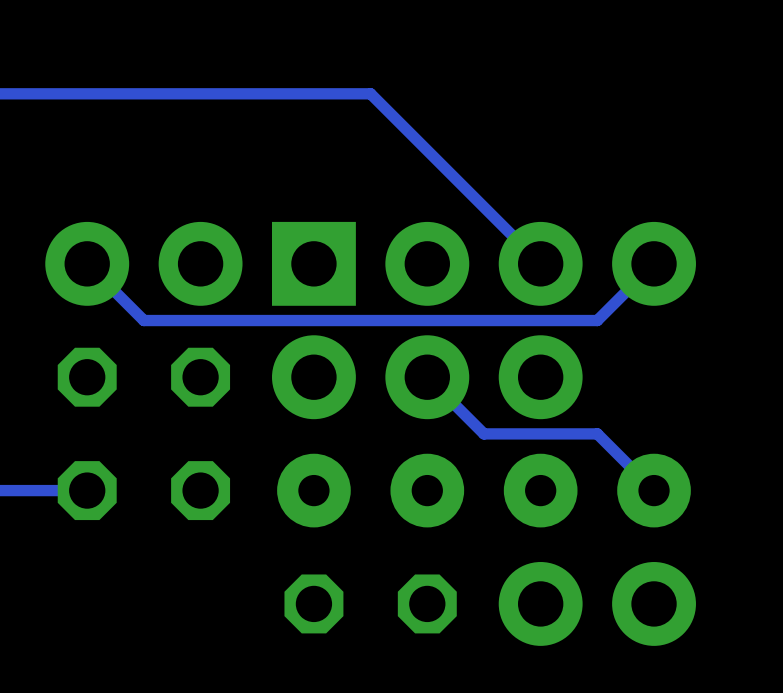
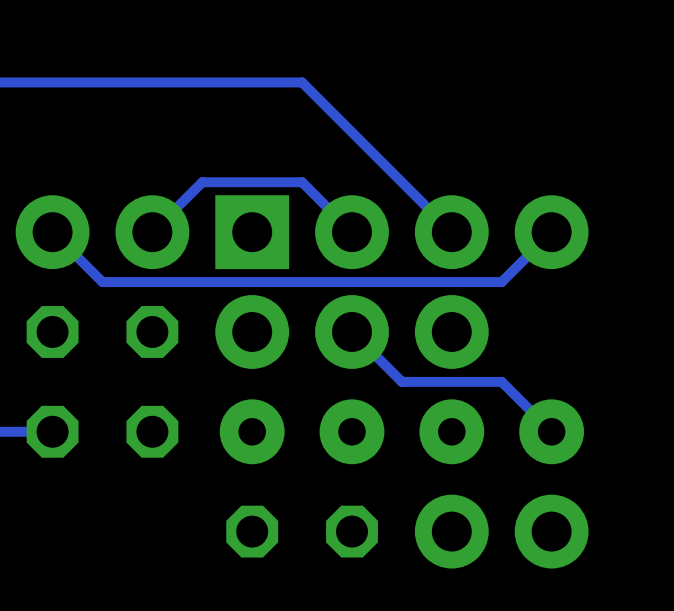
track: none -> (352, 232) (302, 182) (202, 182) (152, 232)

